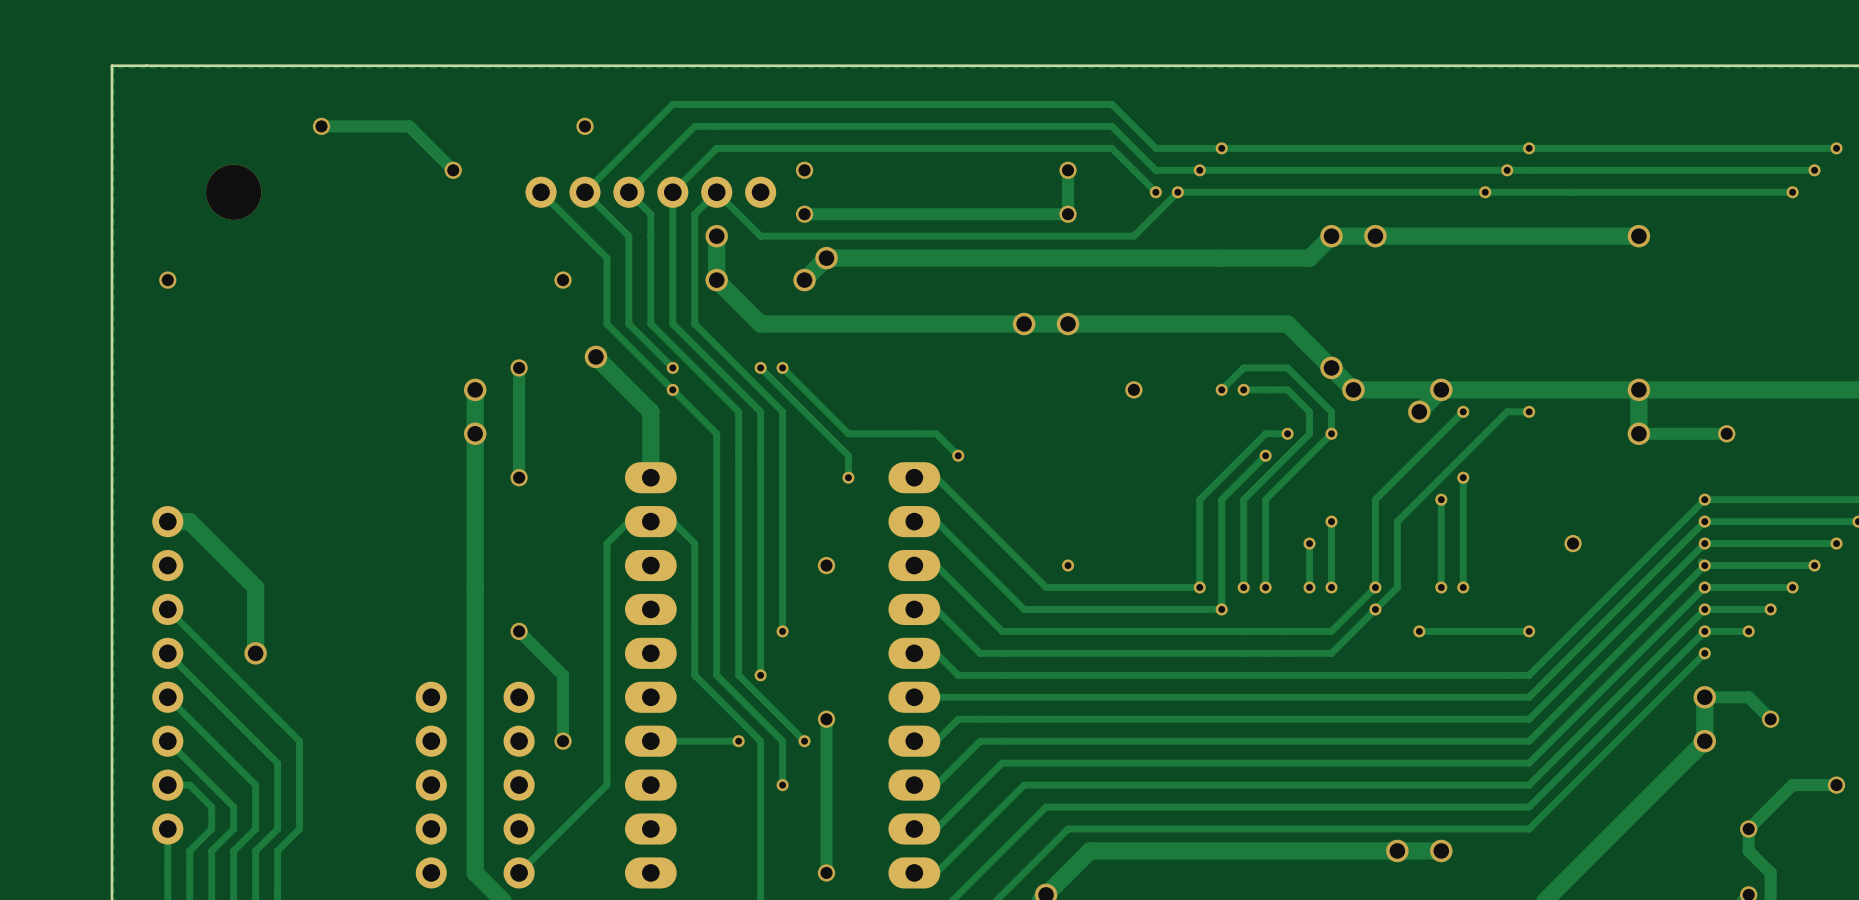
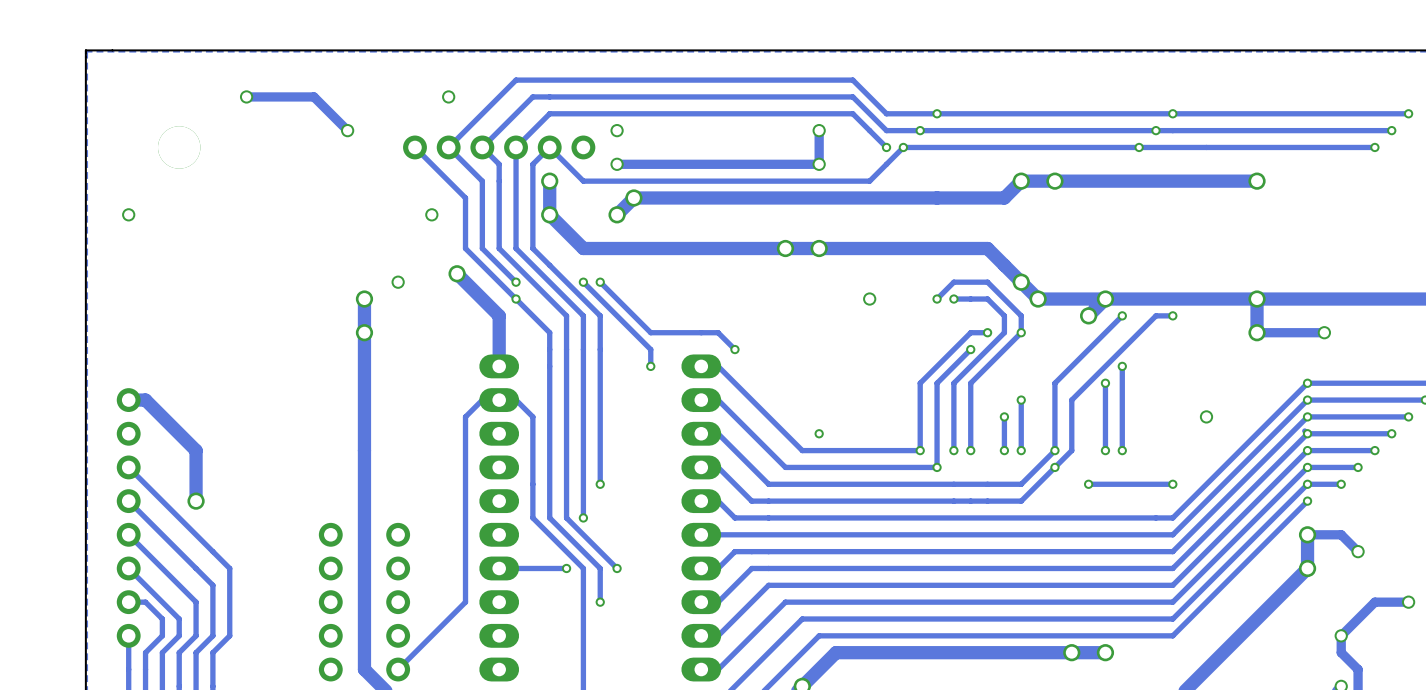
track: (519, 367) (519, 477) -> none
via: (519, 477) -> none
via: (826, 565) -> none
track: (519, 631) (563, 675) (563, 741) -> none
via: (519, 631) -> none
track: (826, 719) (826, 872) -> none
via: (826, 719) -> none
via: (563, 741) -> none
via: (826, 872) -> none

